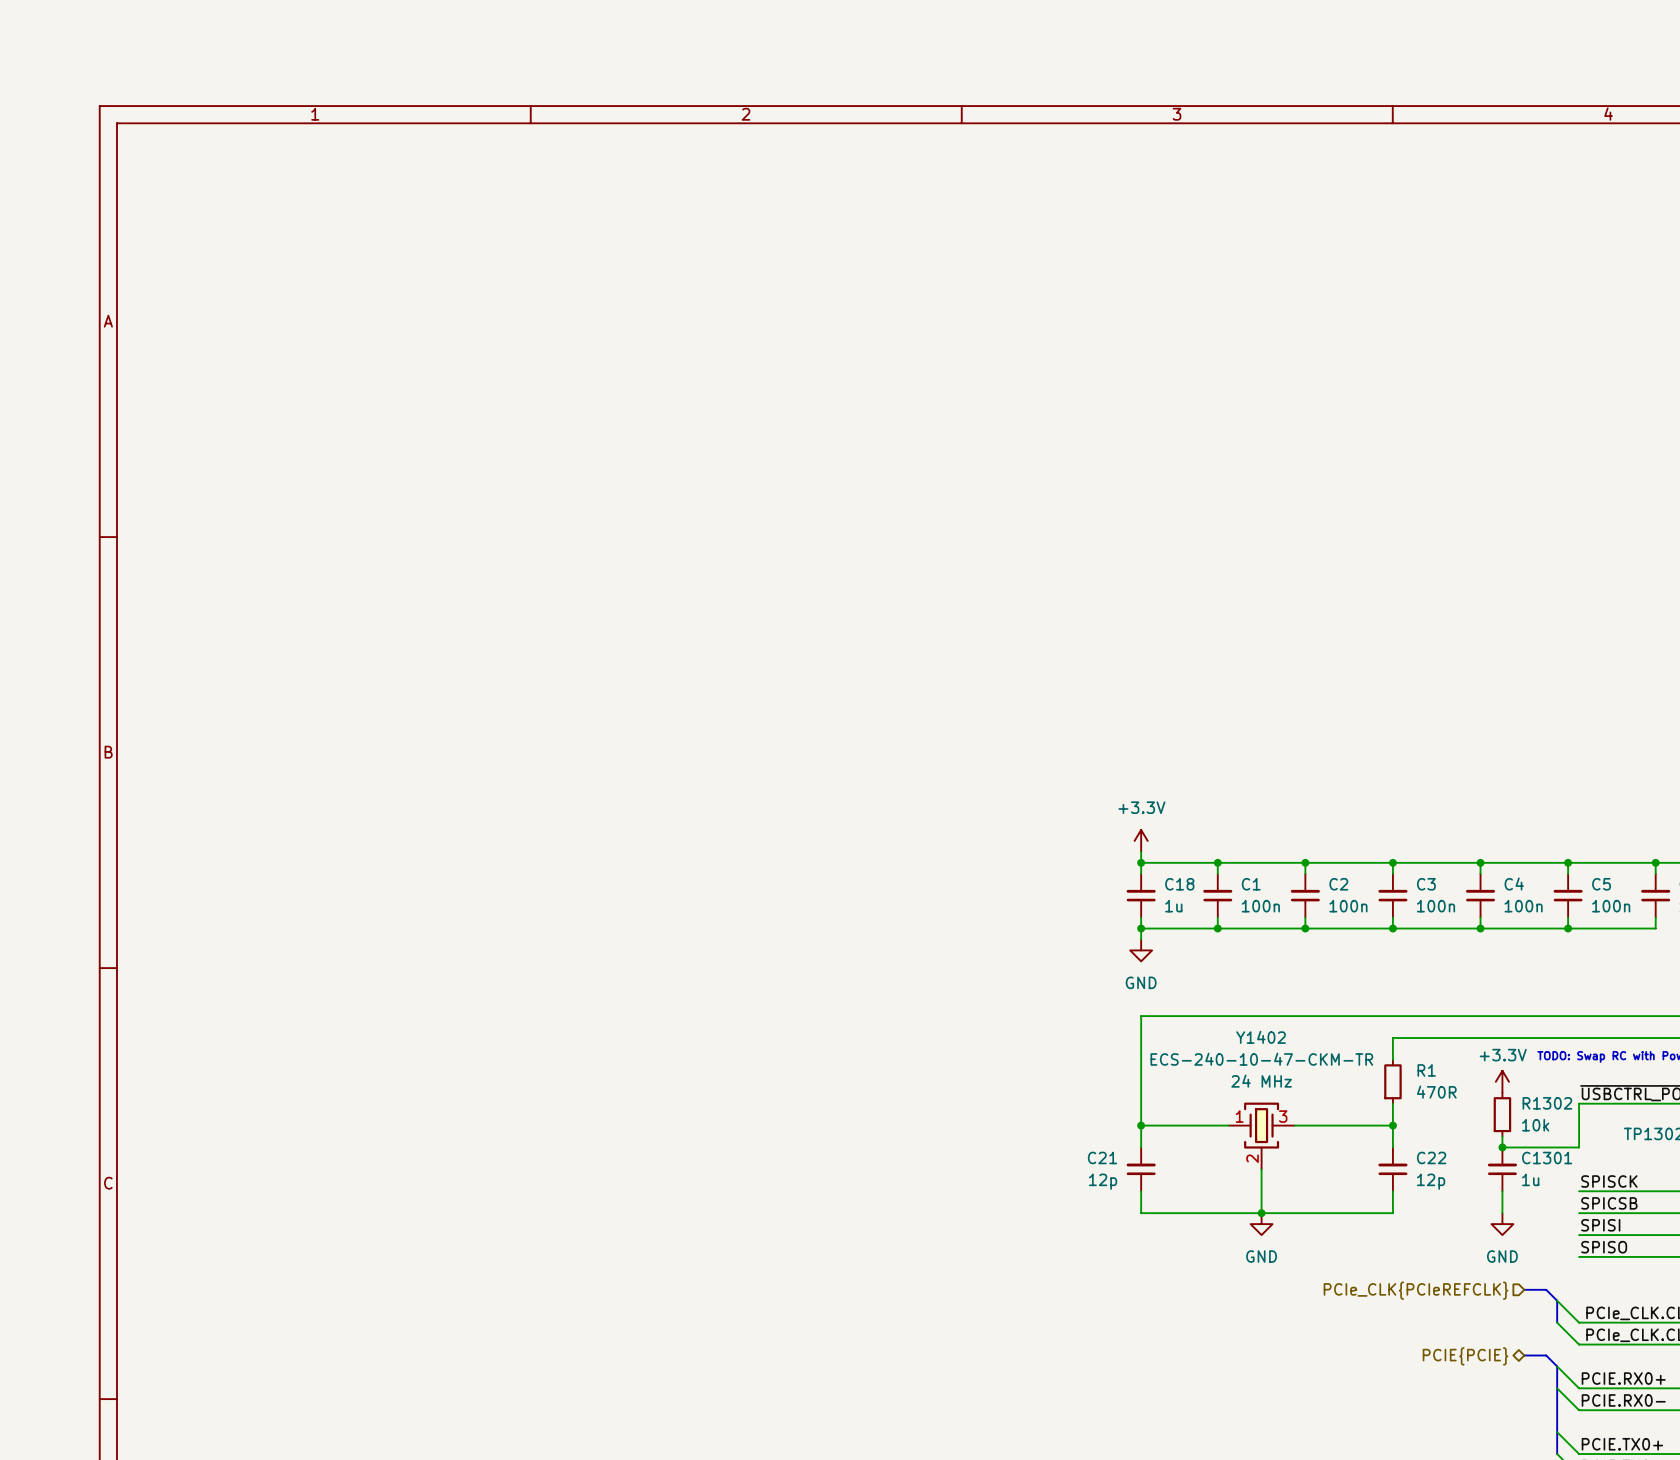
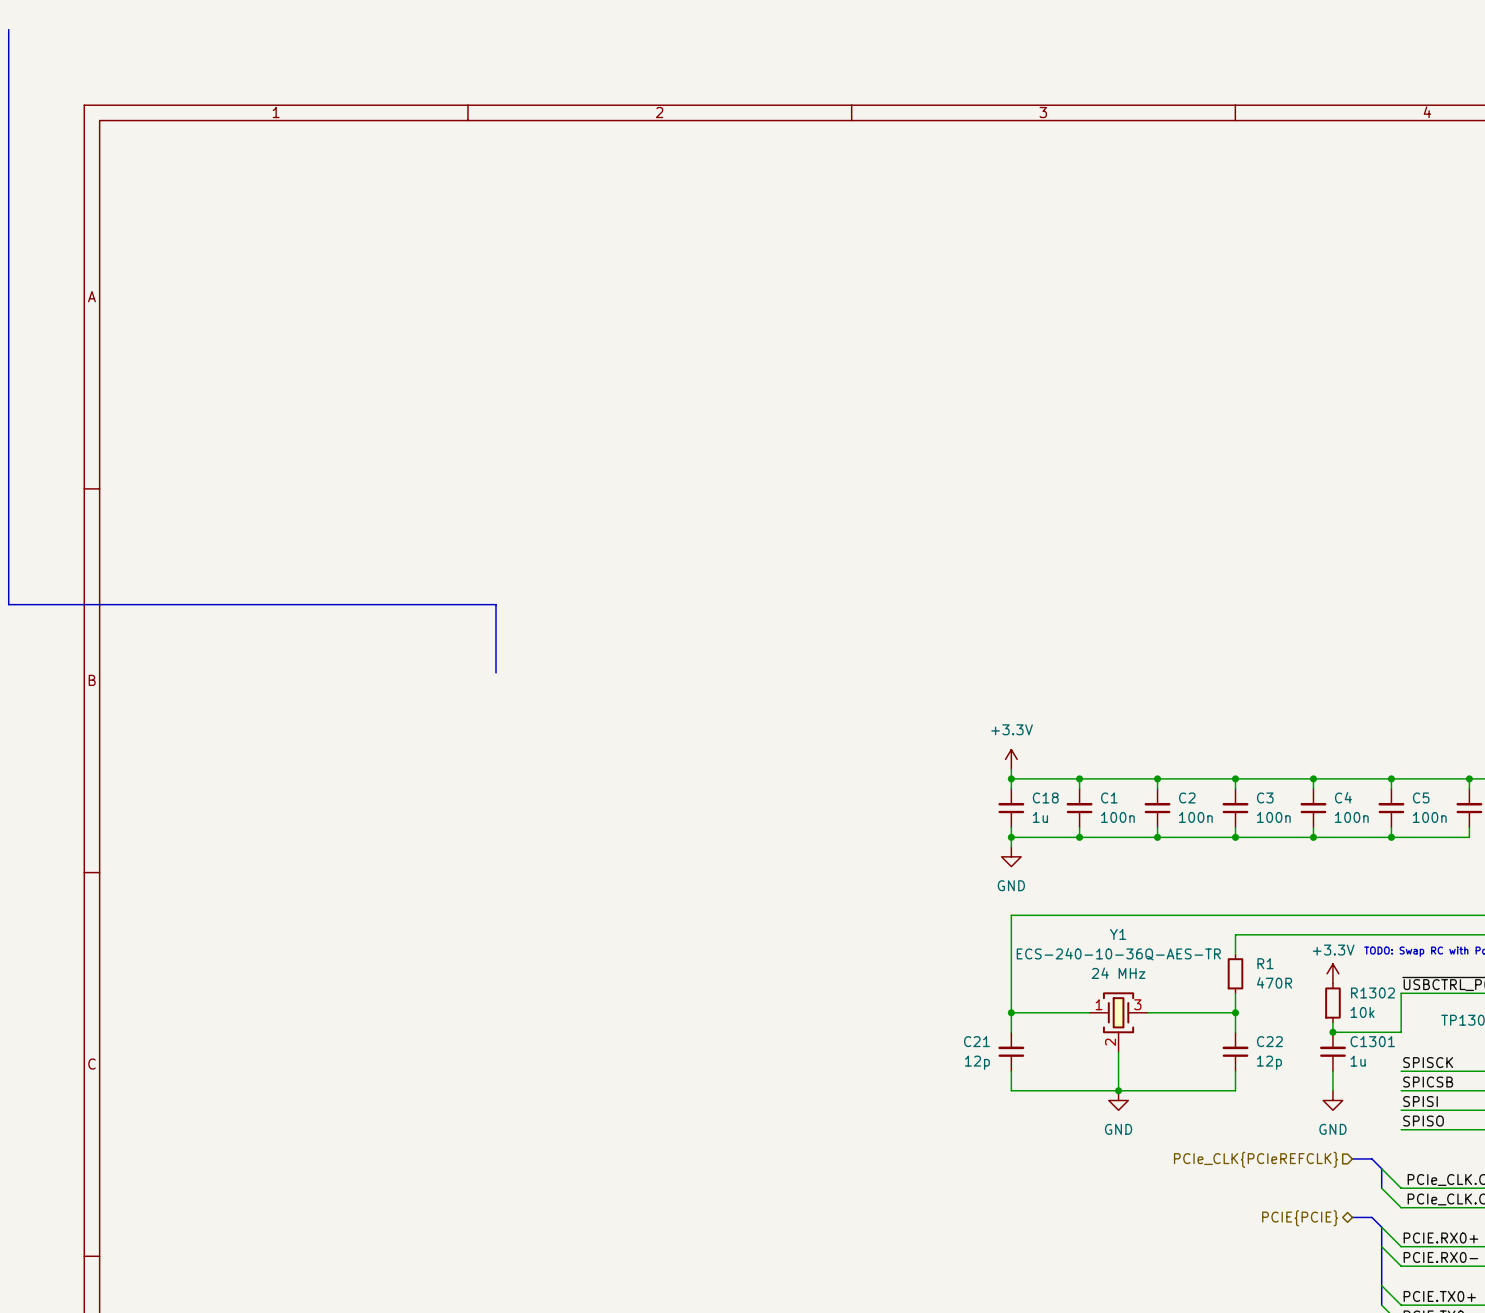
bus: none -> (8, 29) (8, 604) (496, 604) (496, 672)
Y1402 name: Y1402 (1261, 1037) -> Y1 (1118, 934)
Y1402 text: ECS-240-10-47-CKM-TR (1261, 1059) -> ECS-240-10-36Q-AES-TR (1118, 954)

